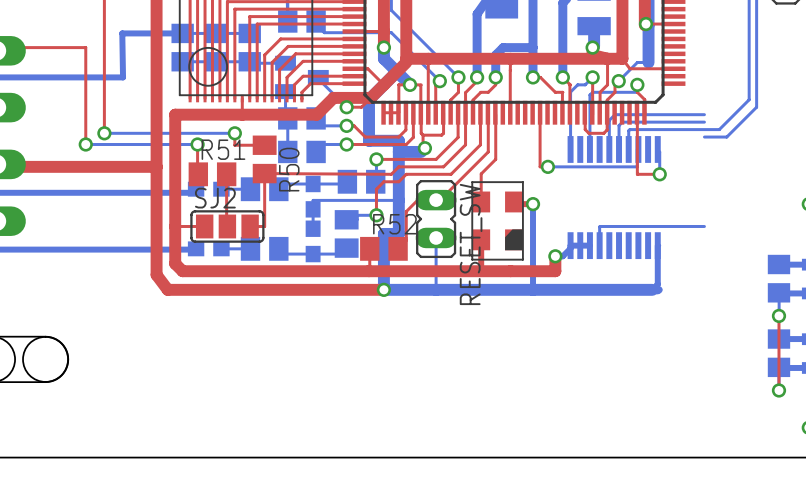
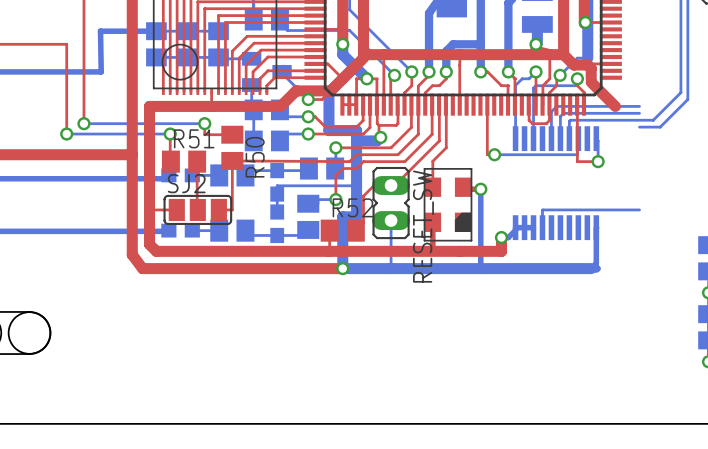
top track: none -> (563, 54) (573, 65) (587, 65) (591, 68) (591, 78)
top track: none -> (591, 82) (615, 106)

